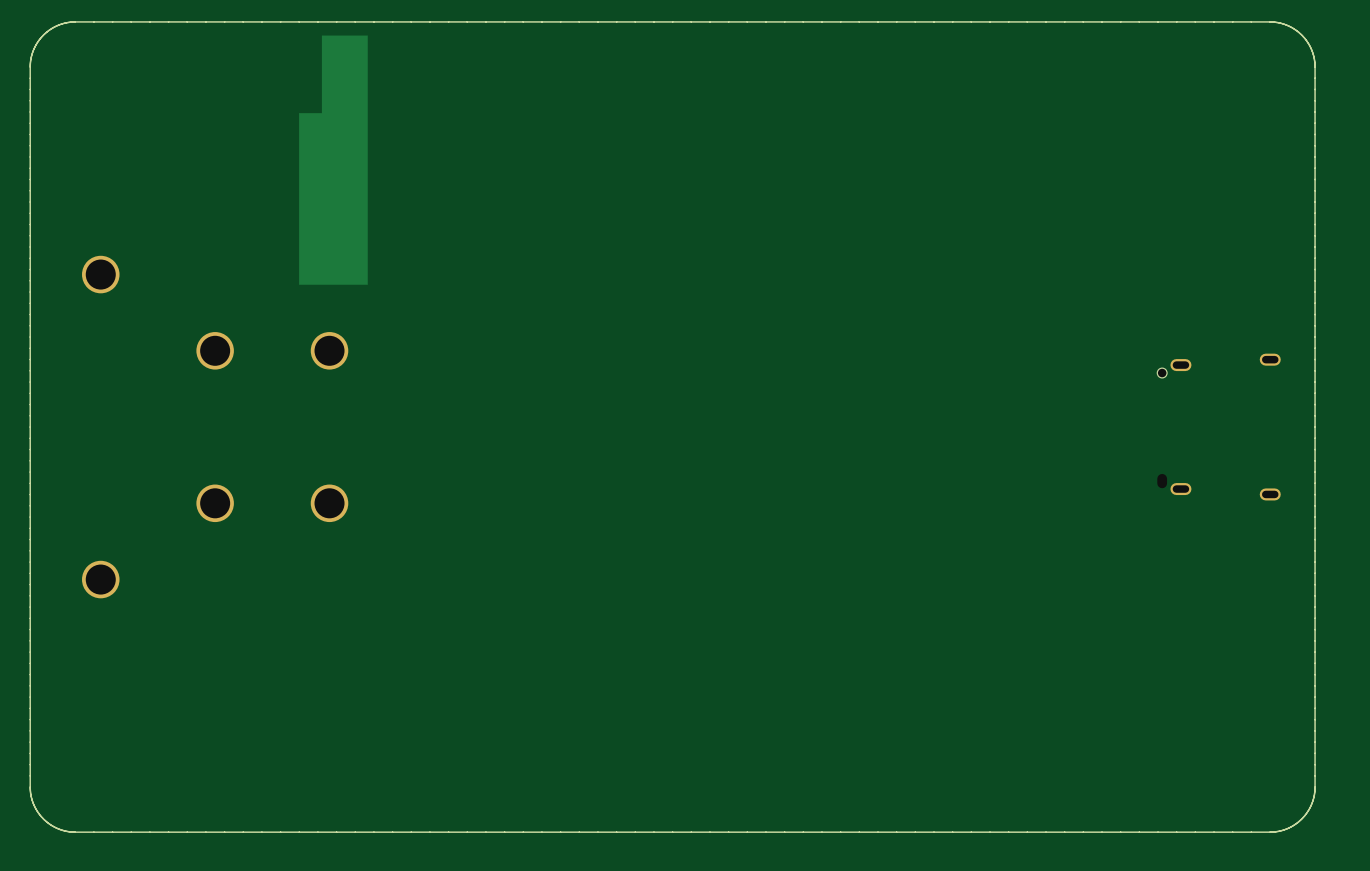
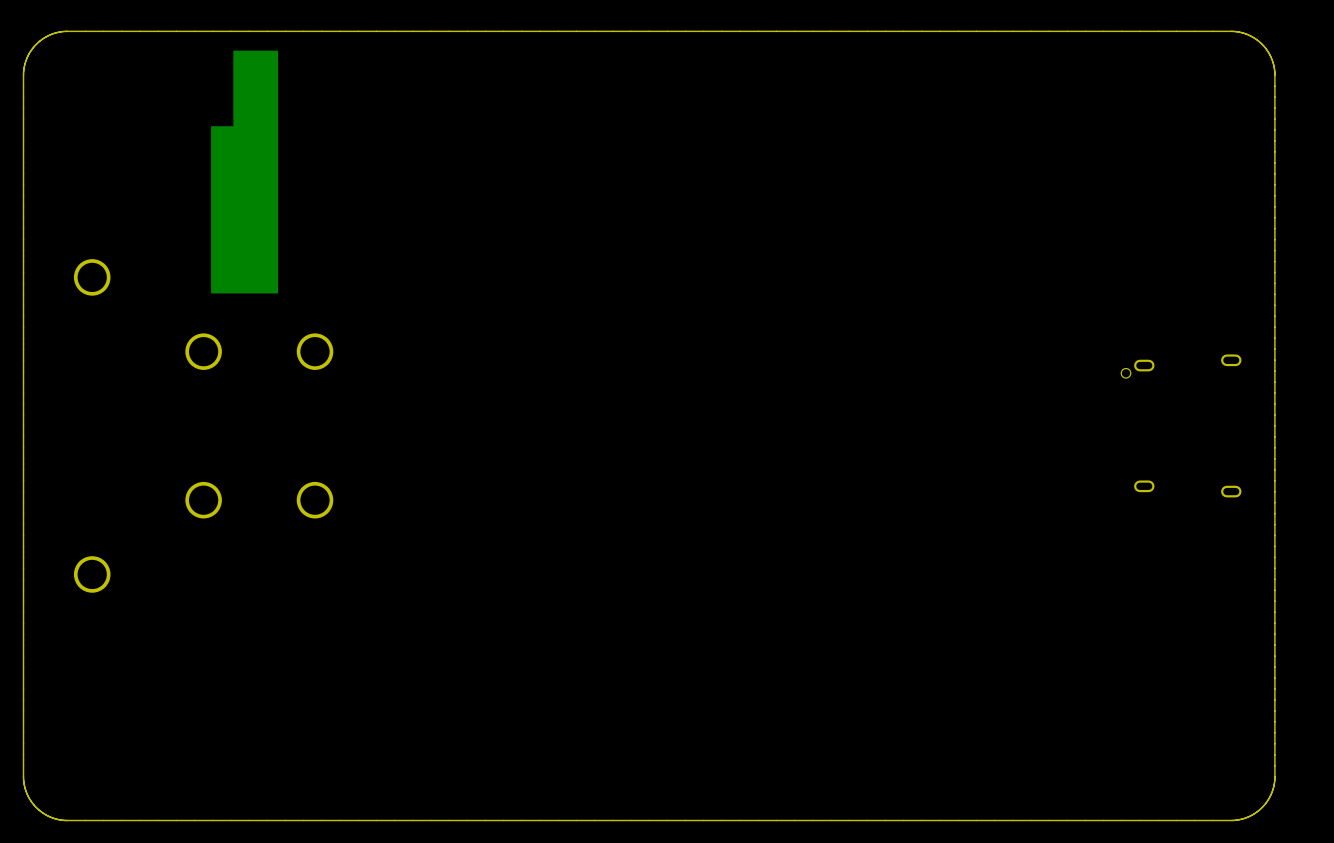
part position: (333, 160) -> (244, 172)

